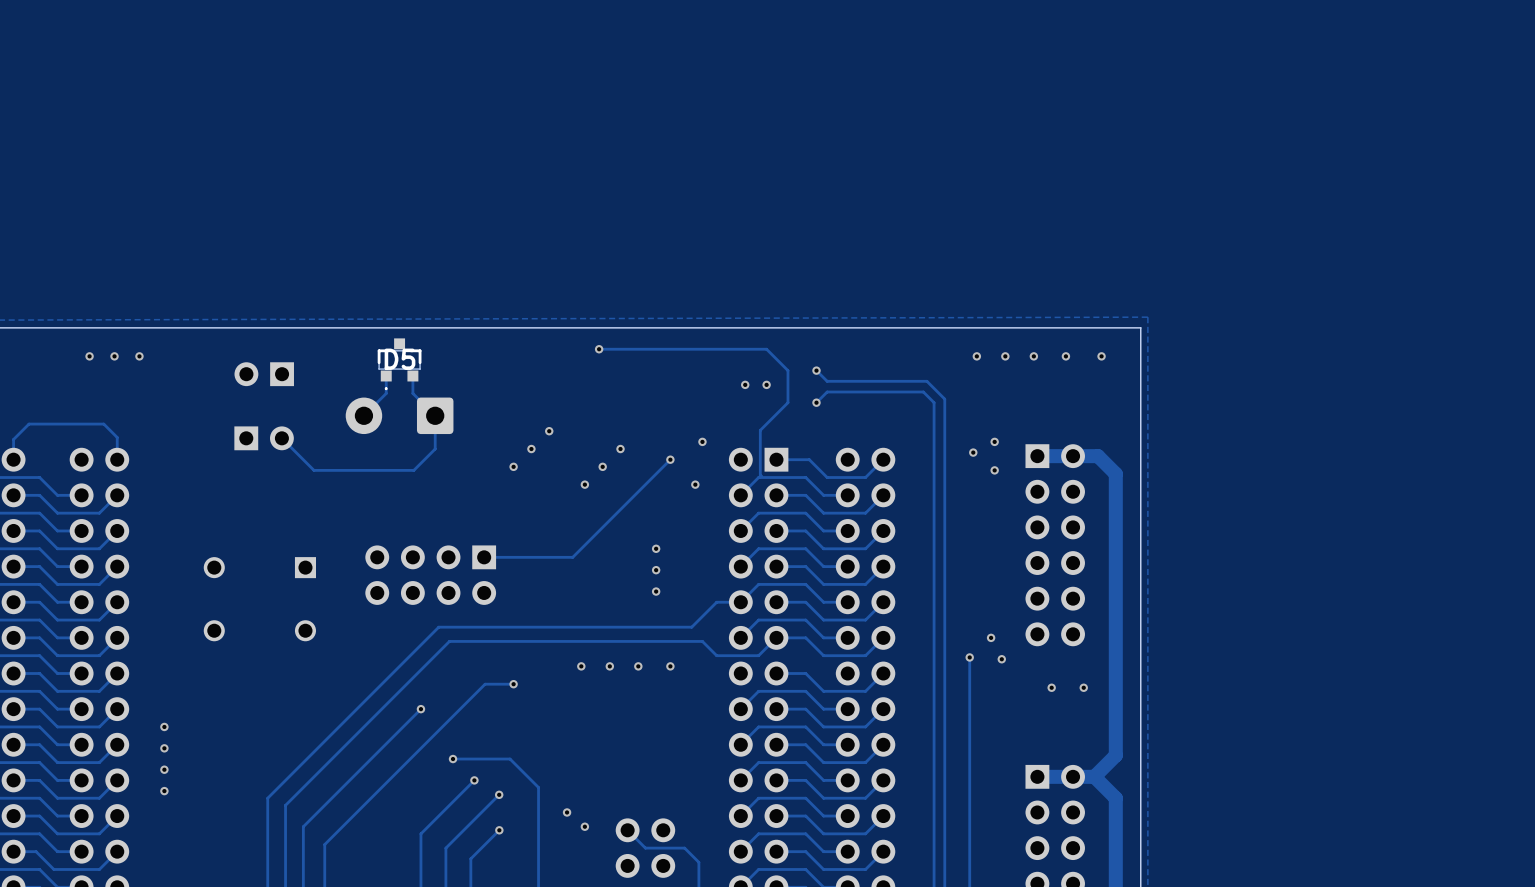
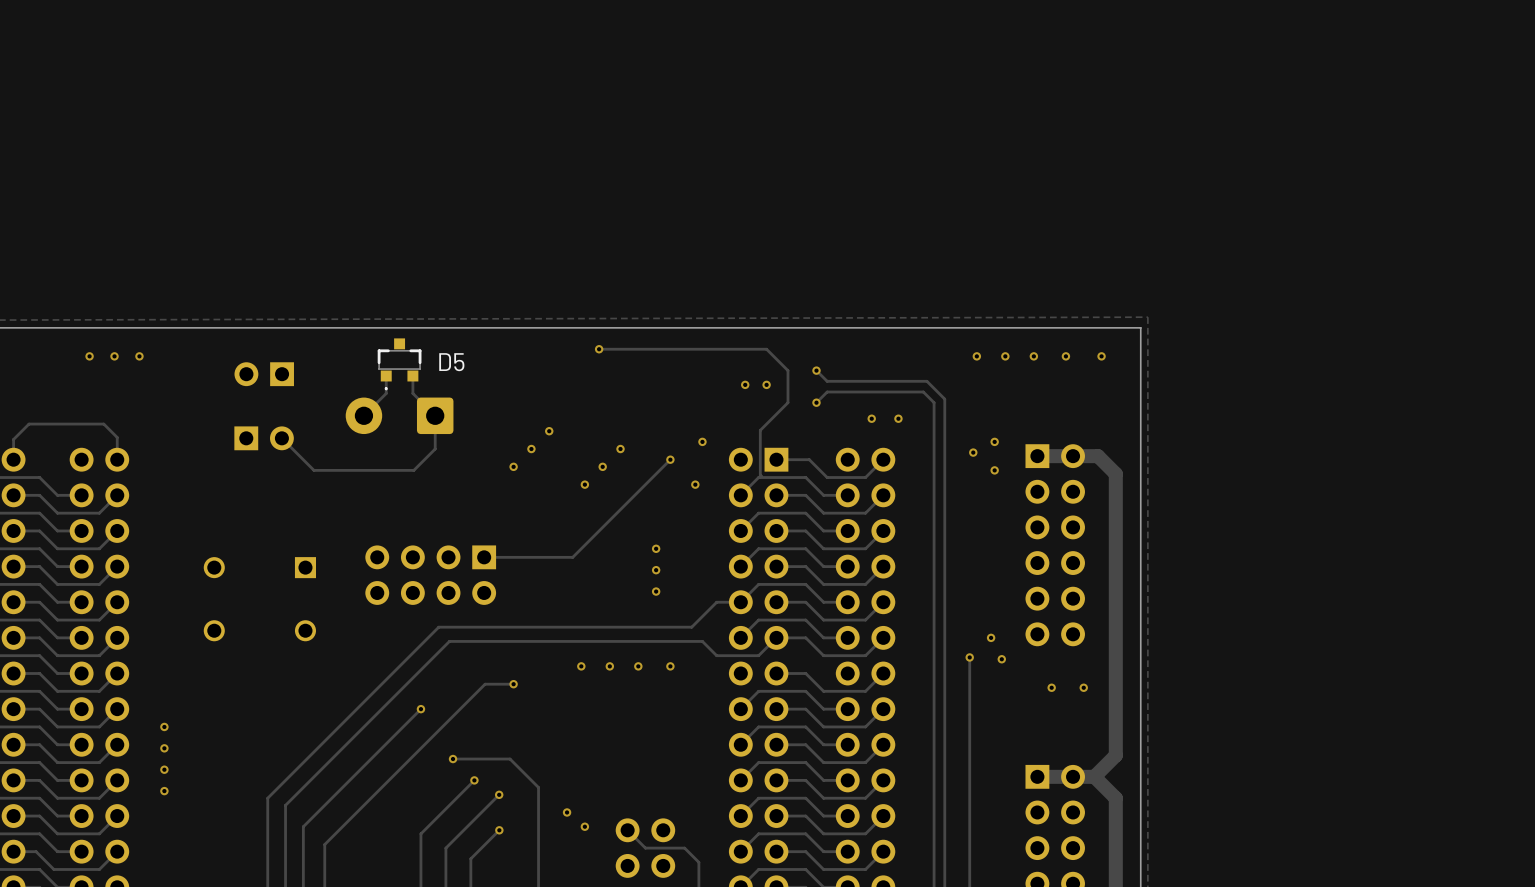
D5 name position: D5 (400, 359) -> D5 (451, 362)
via: none -> (871, 418)
via: none -> (898, 418)

